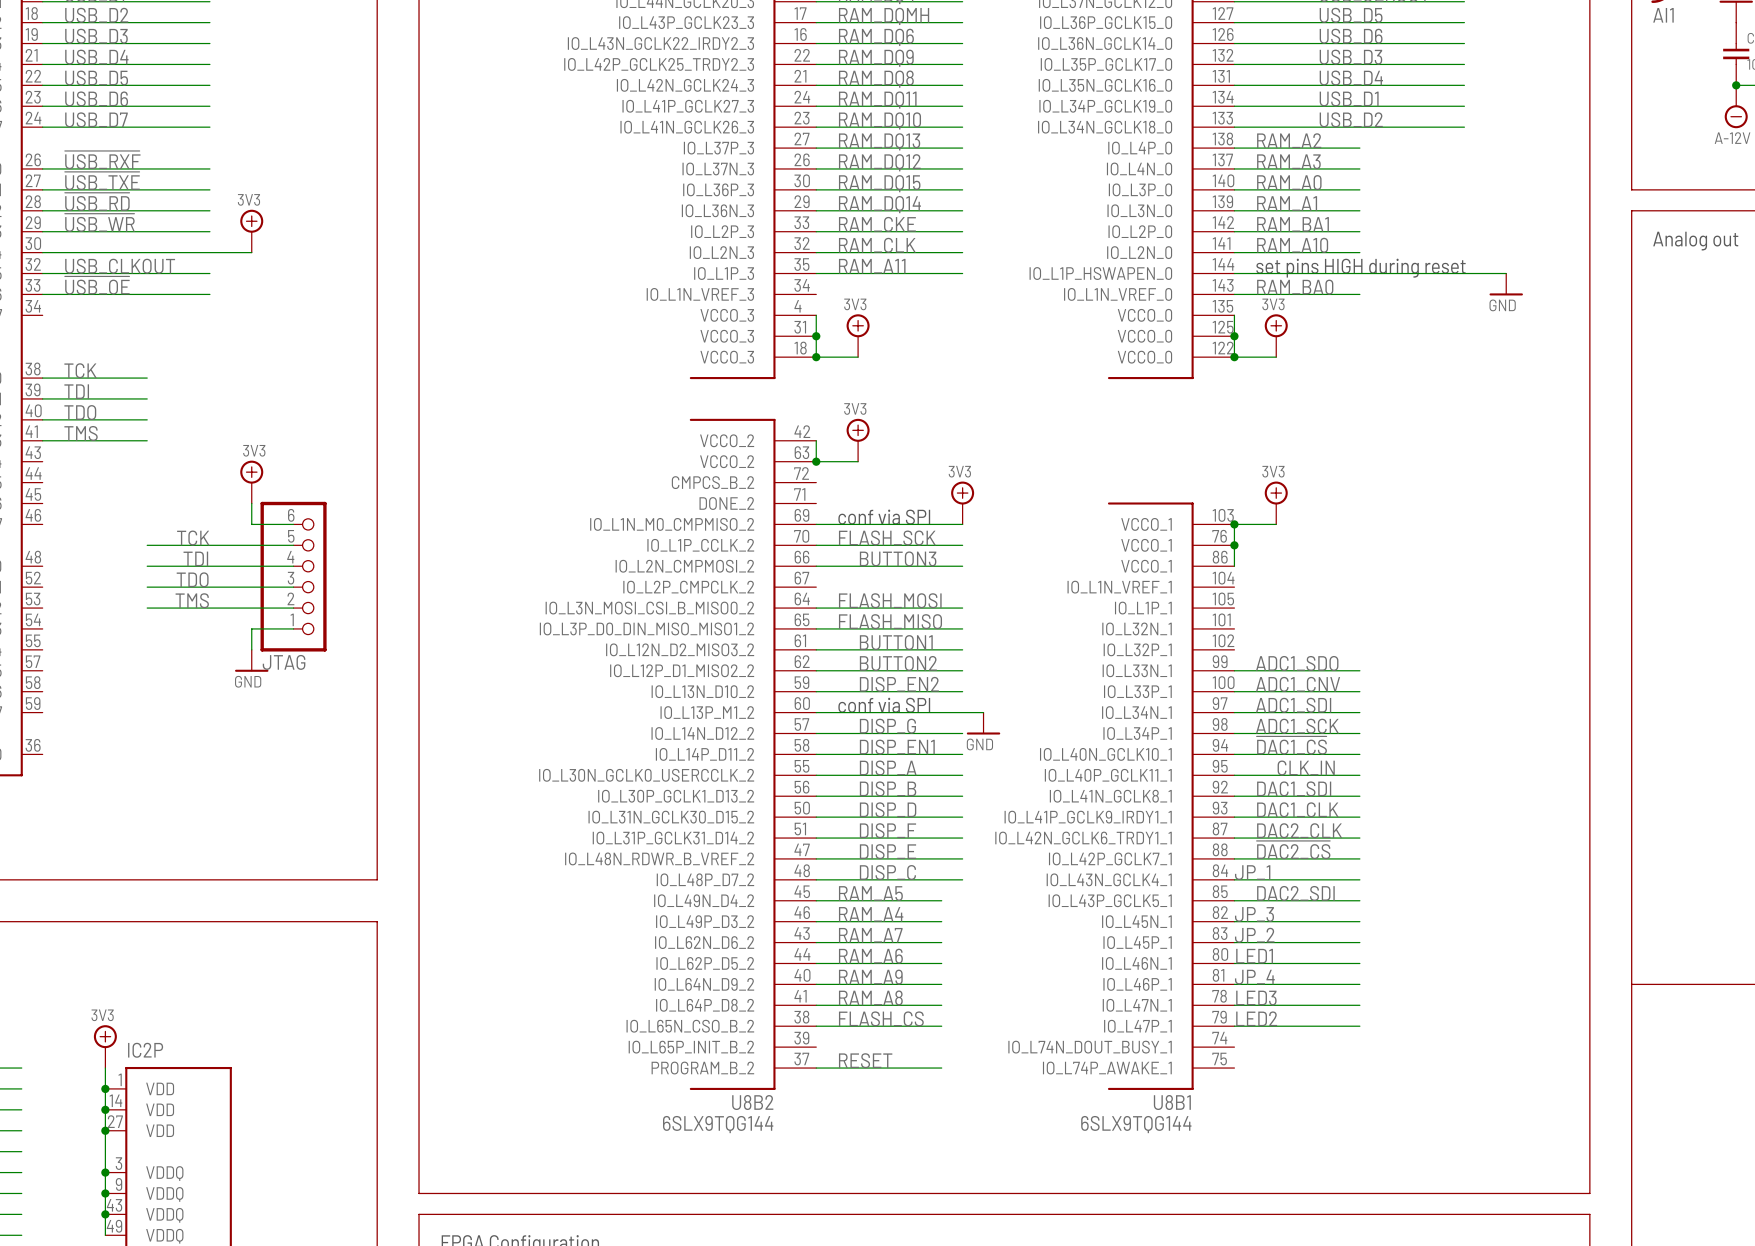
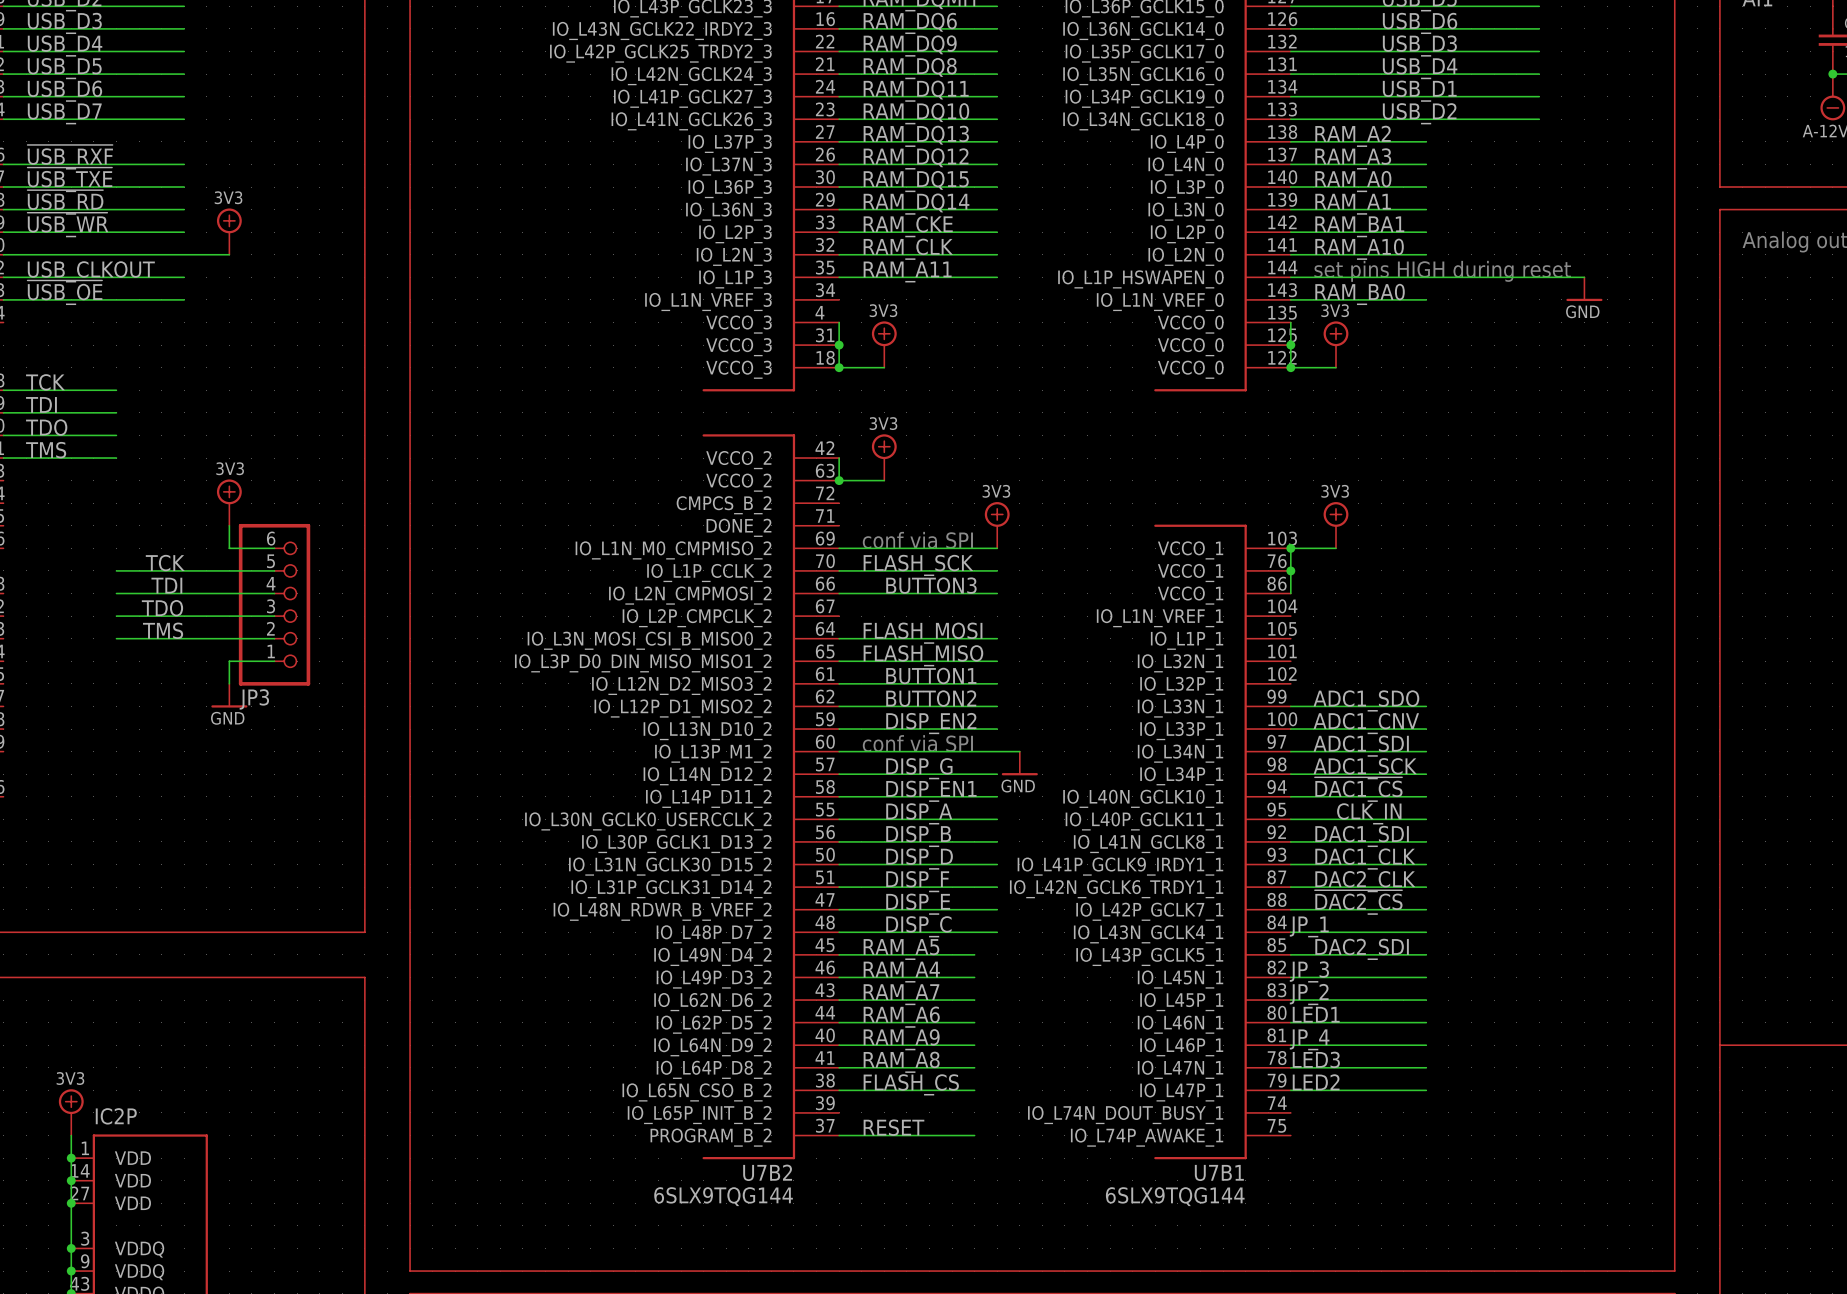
JTAG name: JTAG (284, 662) -> JP3 (254, 699)
U8B2 name: U8B2 (752, 1102) -> U7B2 (767, 1172)
U8B1 name: U8B1 (1172, 1102) -> U7B1 (1219, 1172)

